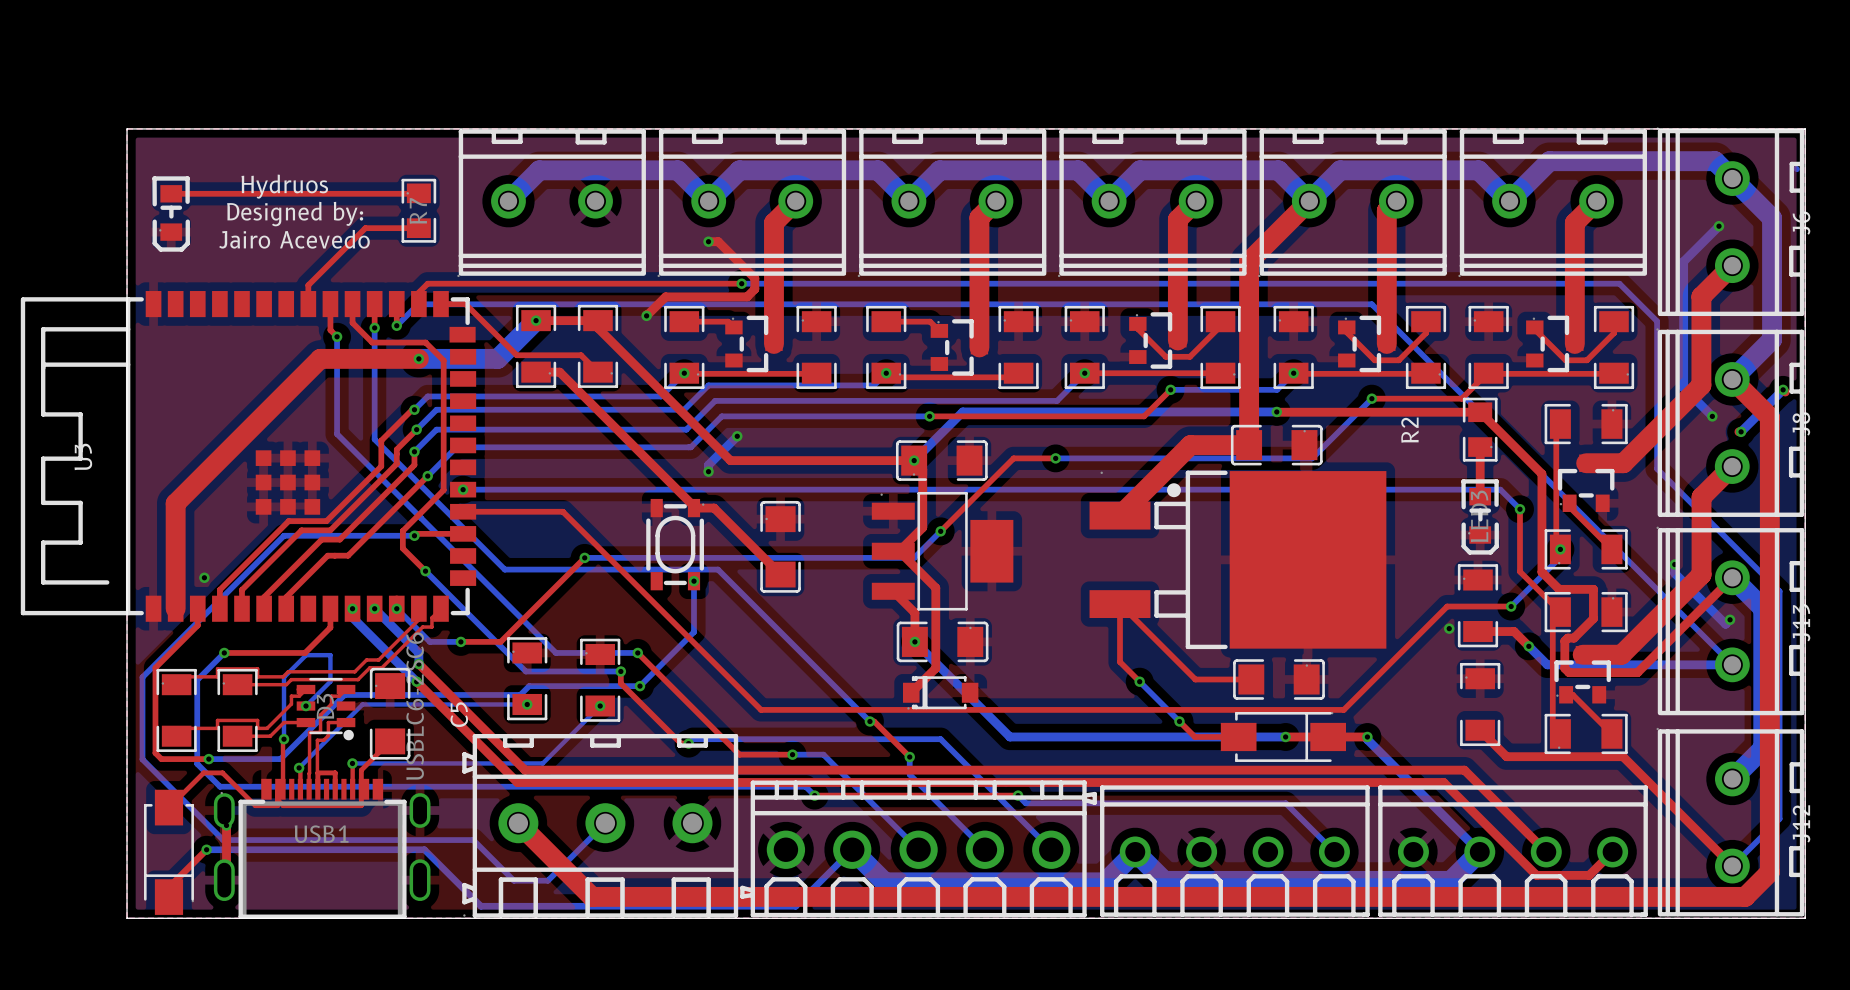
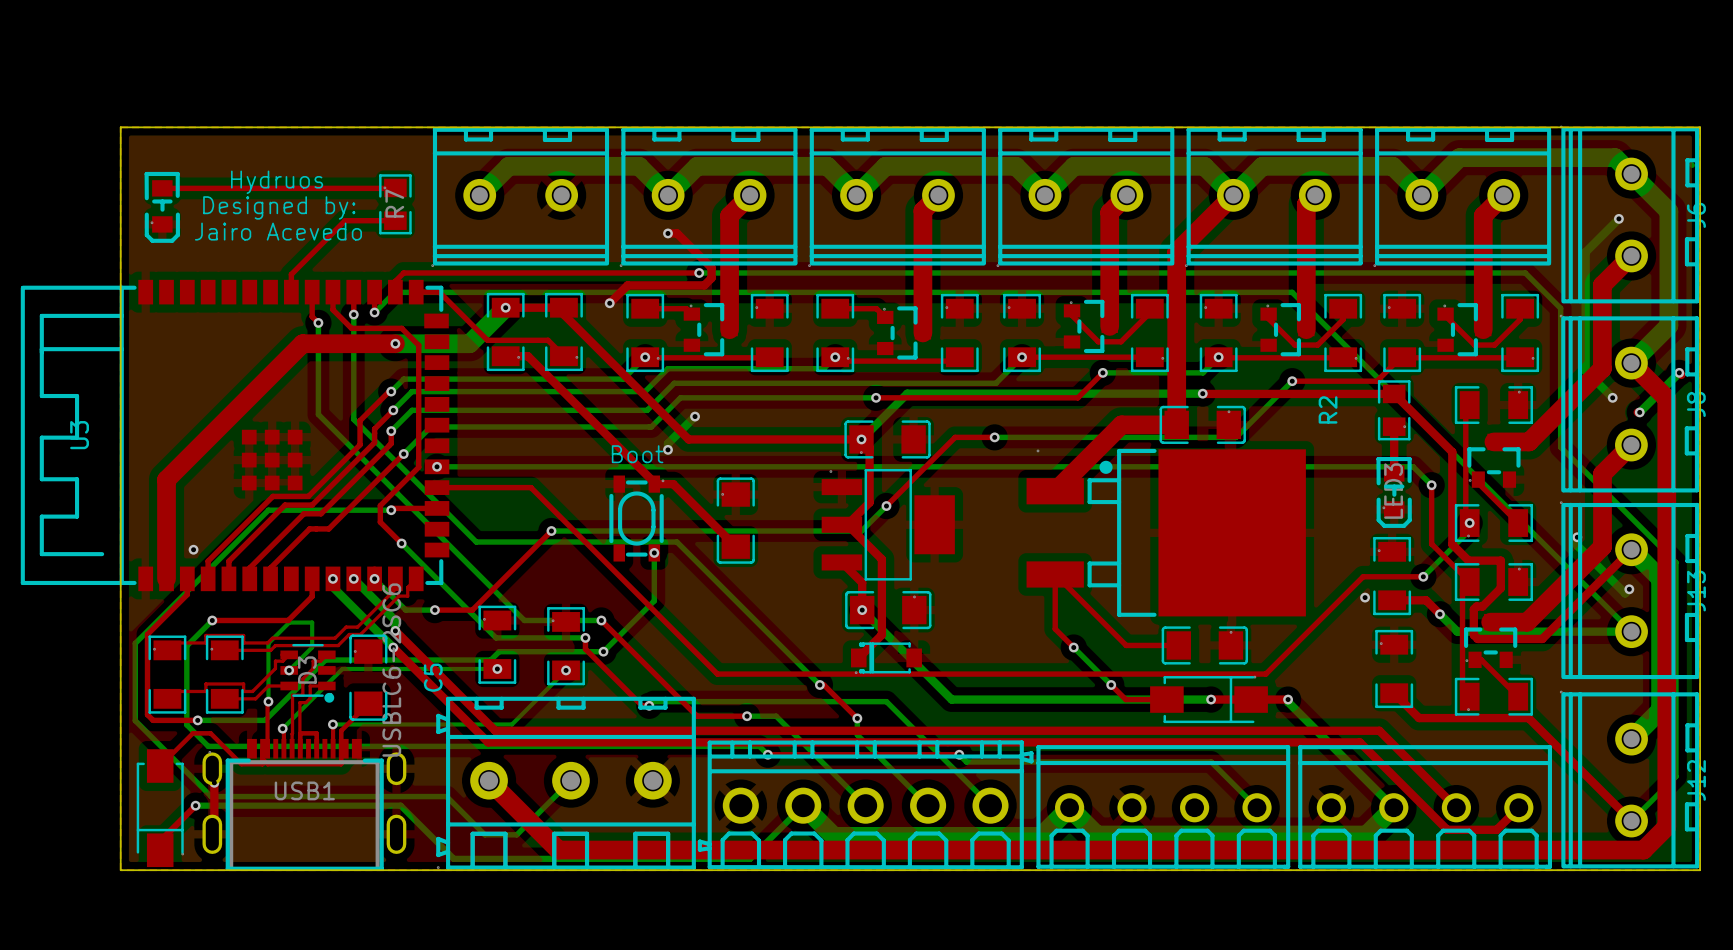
text: none -> Boot (637, 454)

